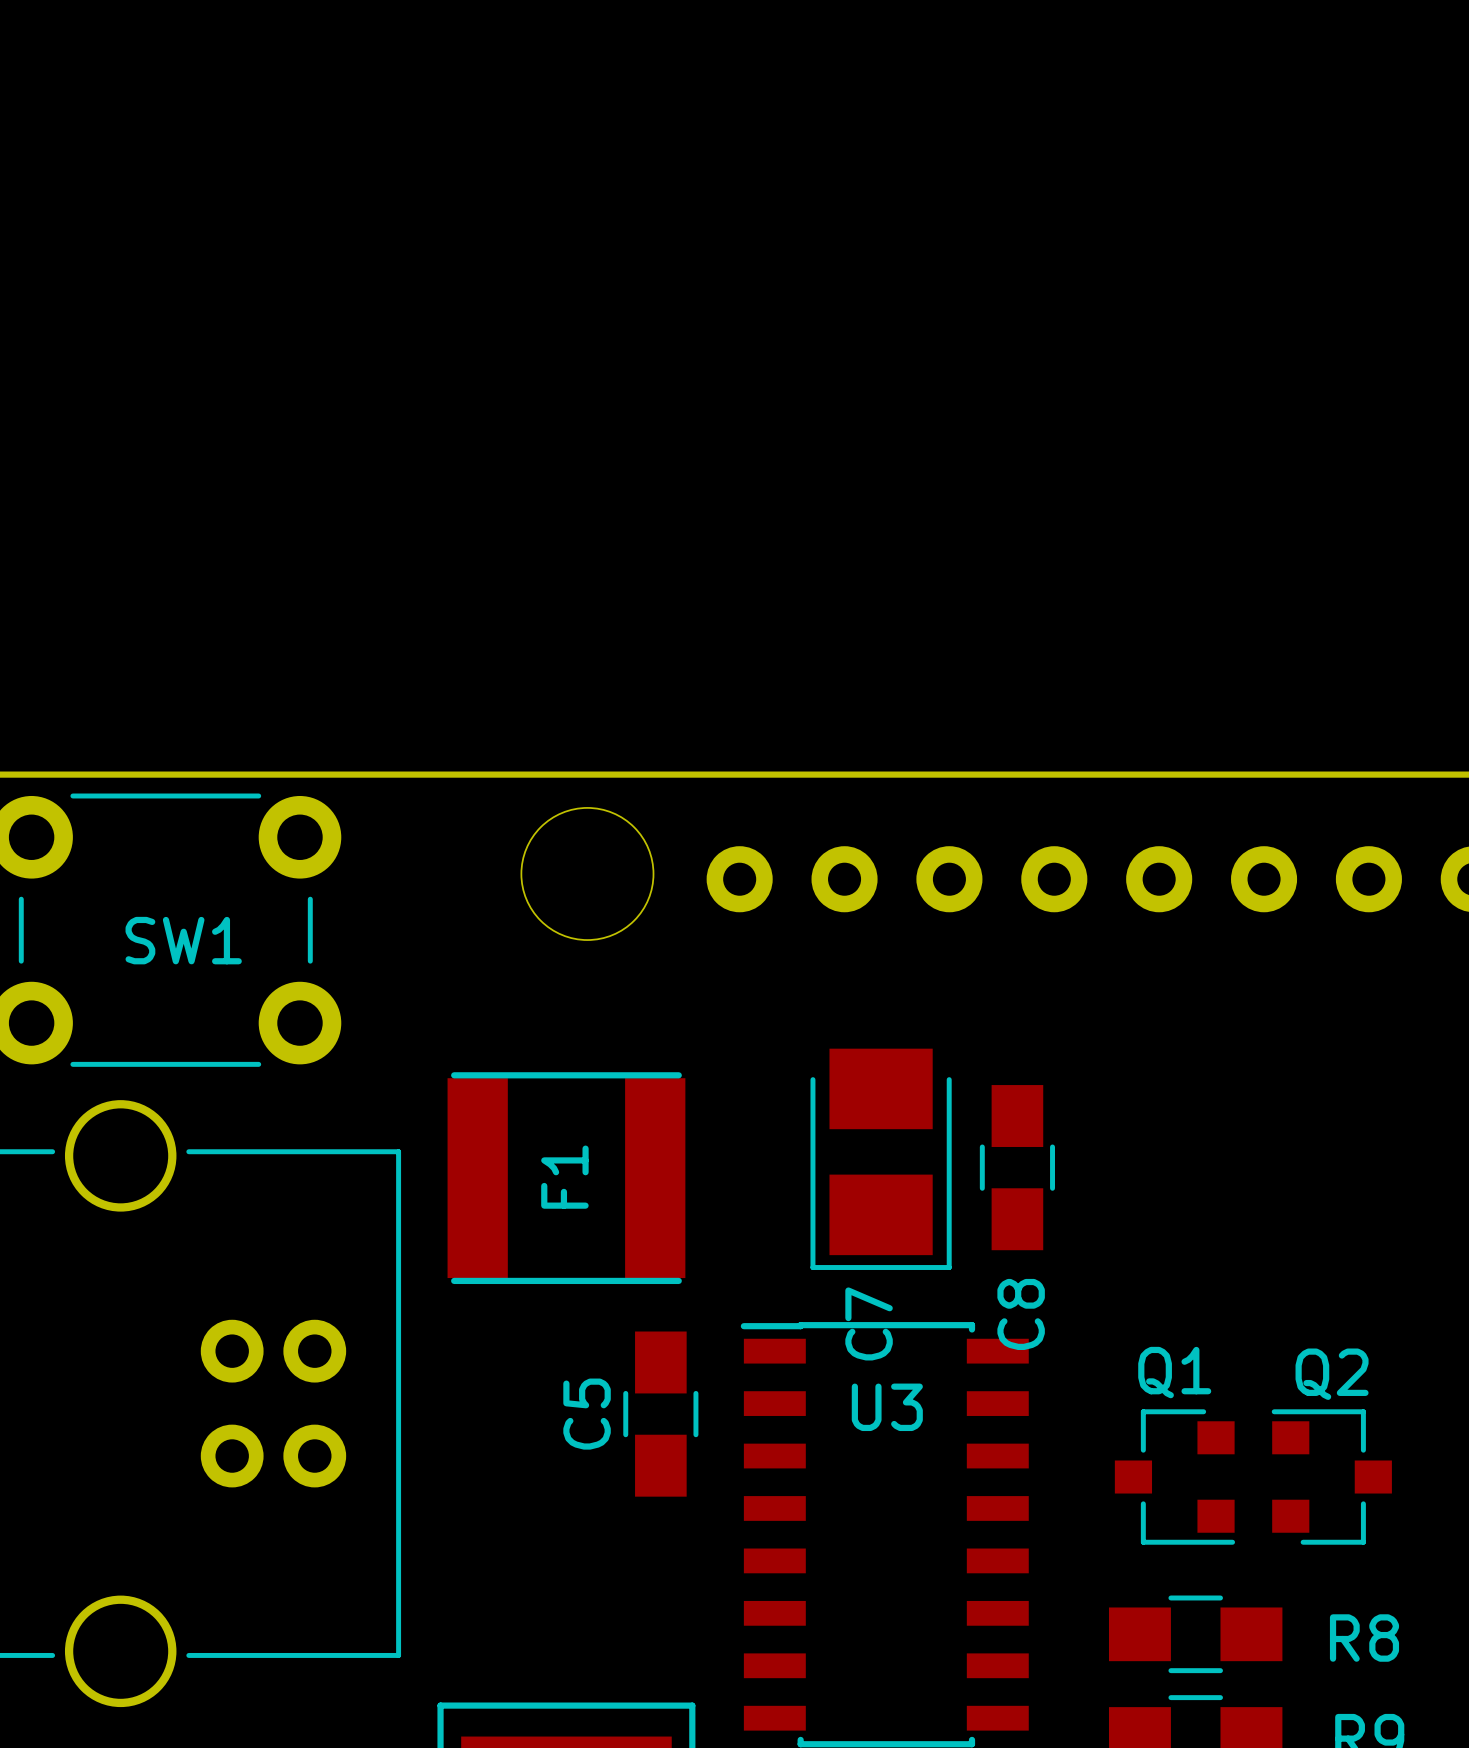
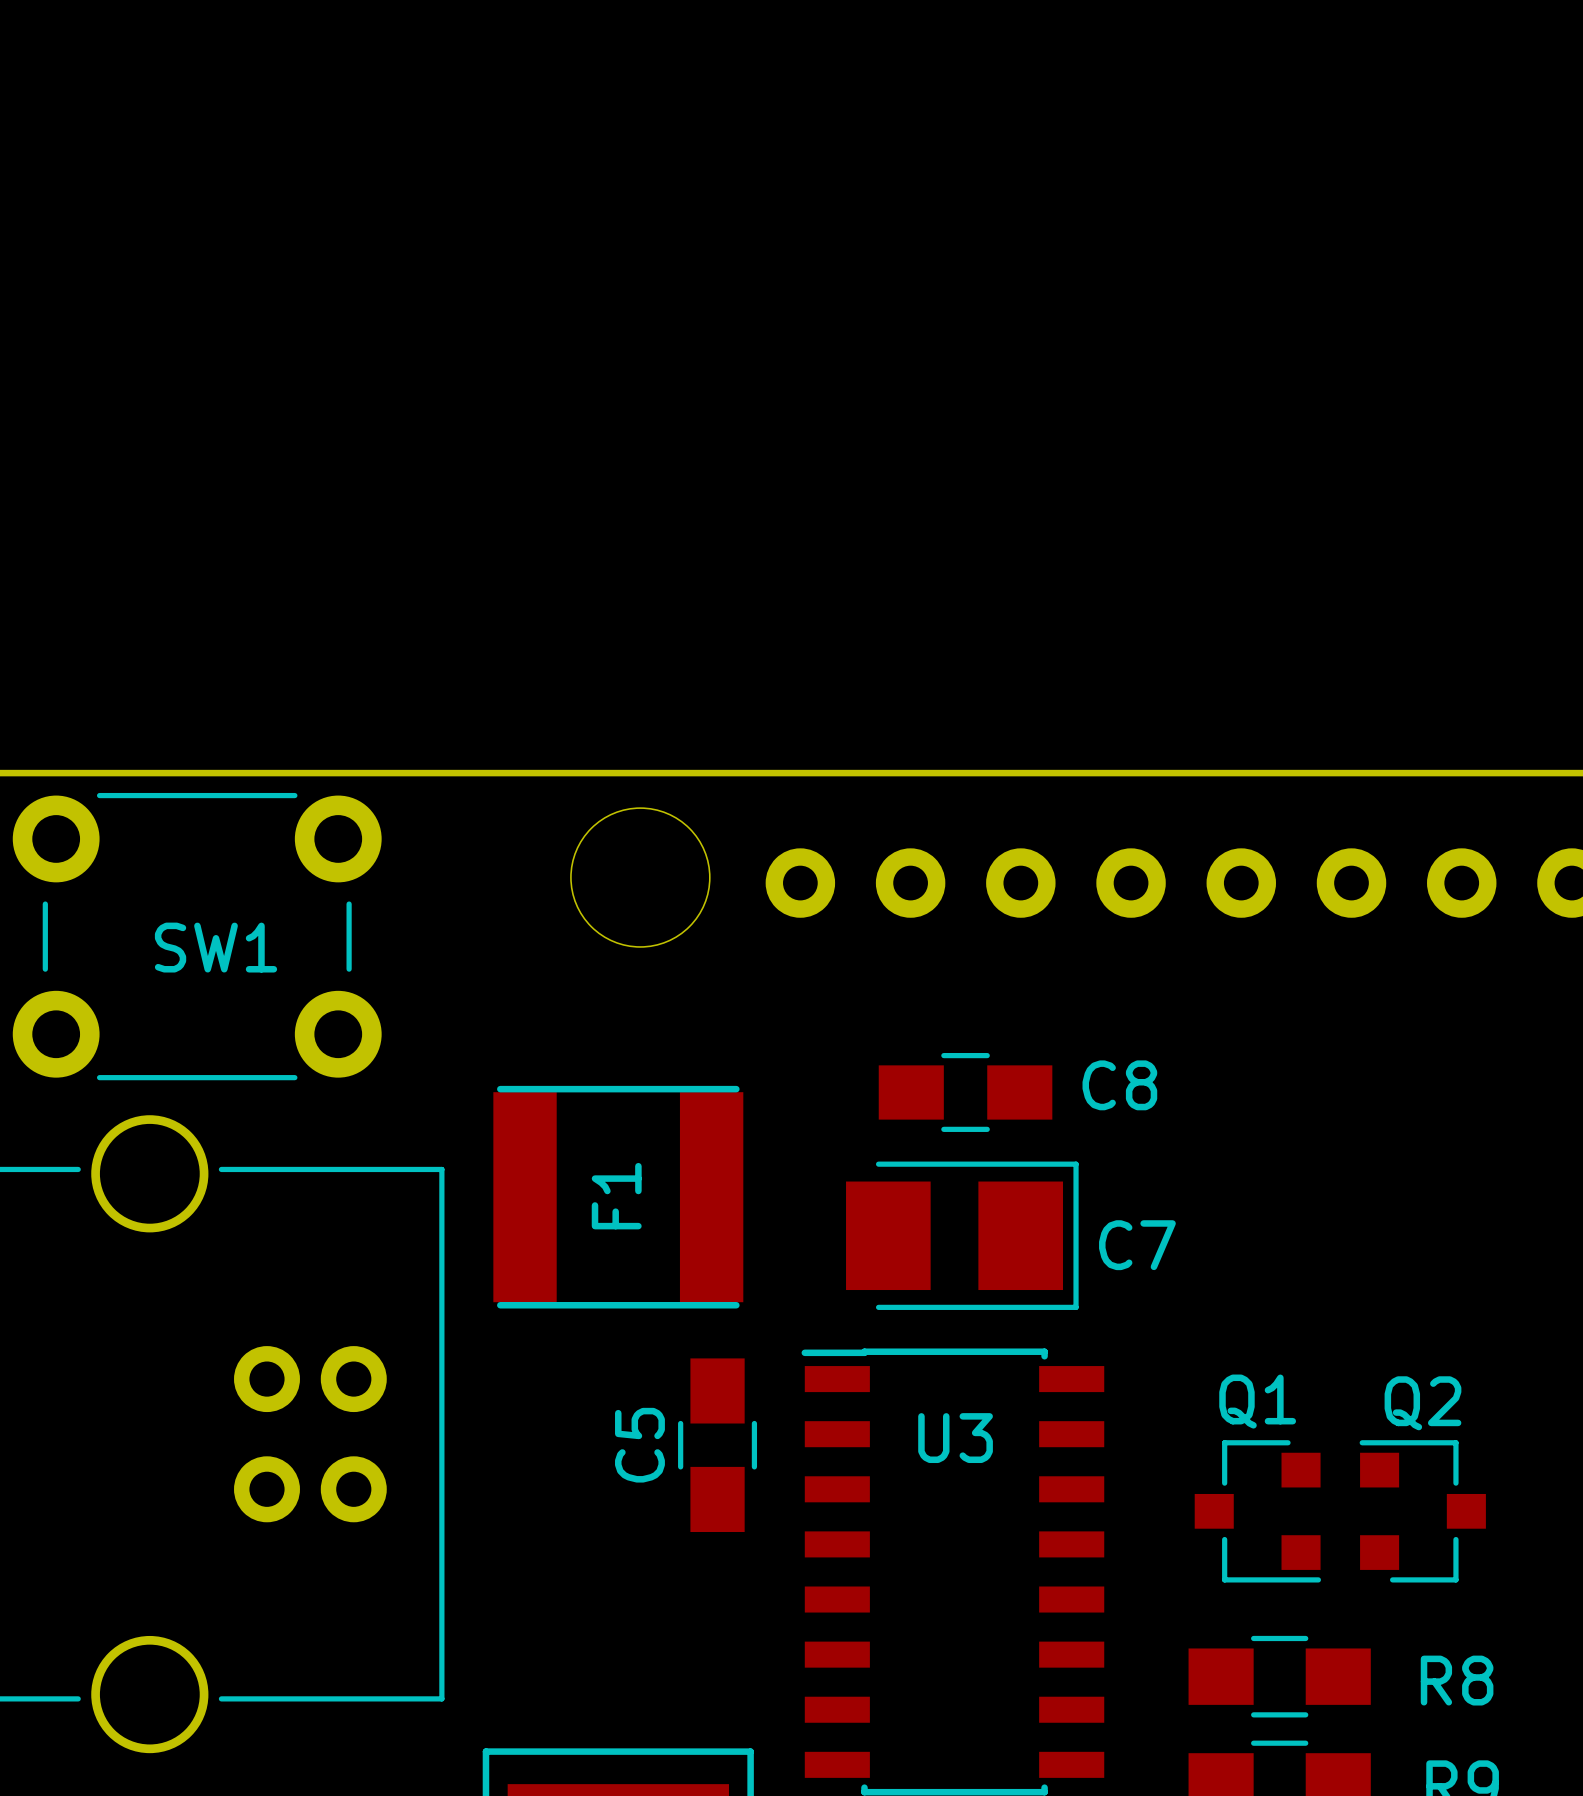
C7 rotation: 0° (881, 1159) -> 90° counterclockwise (962, 1235)
C8 rotation: 0° (1017, 1167) -> 90° clockwise (965, 1092)
C8 position: (1017, 1167) -> (965, 1092)
C8 name position: C8 (1021, 1314) -> C8 (1119, 1085)

